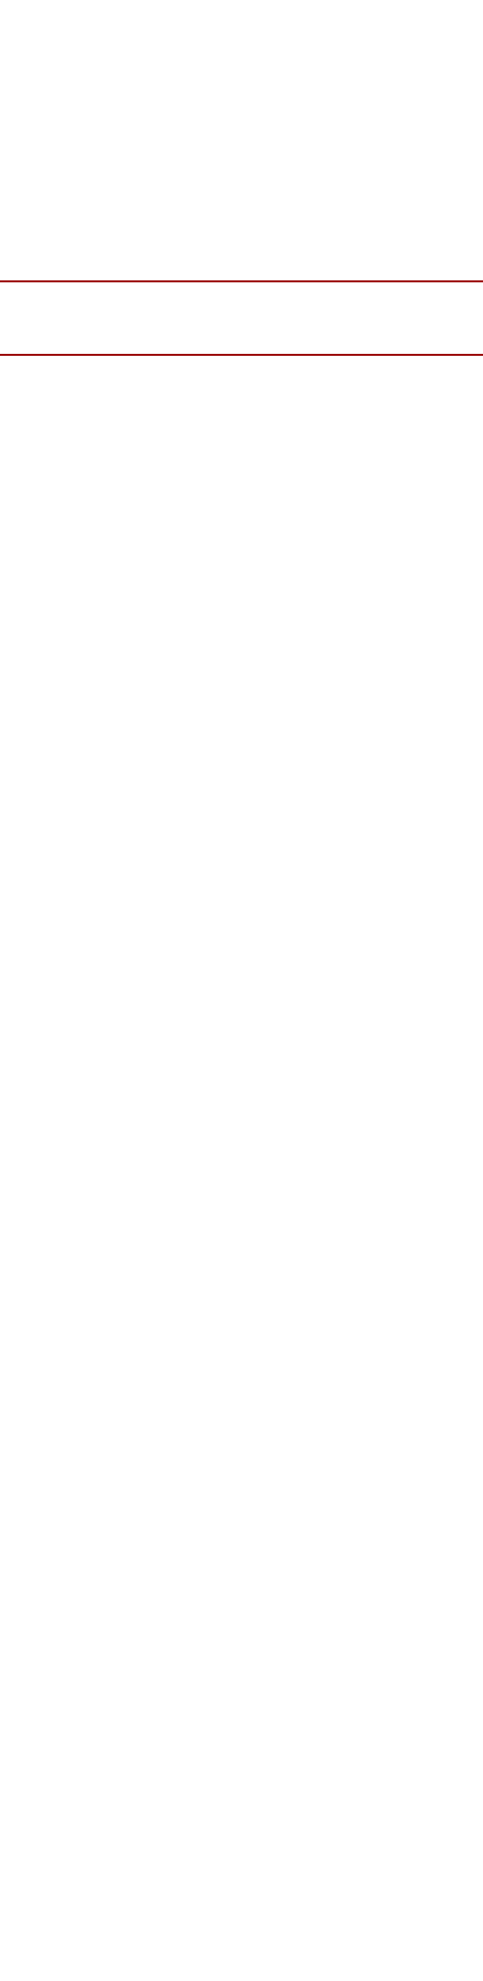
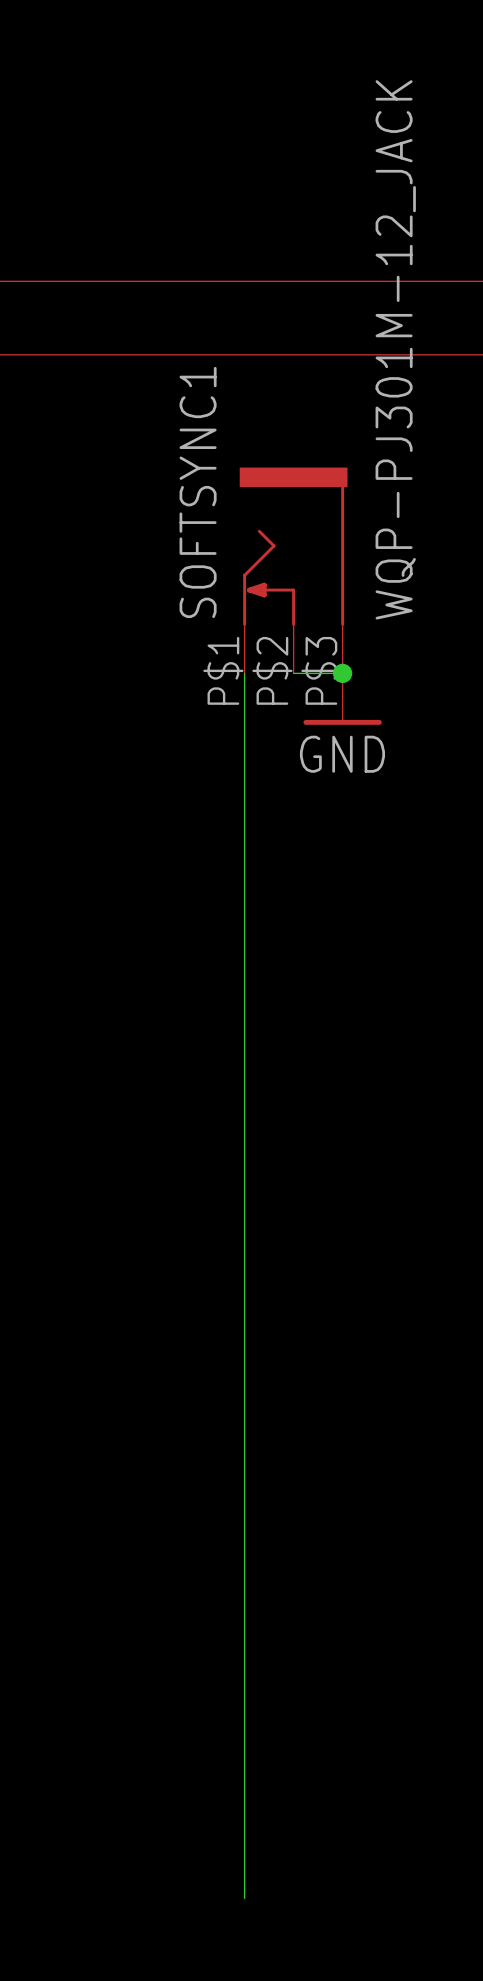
SOFTSYNC1: none -> WQP-PJ301M-12_JACK (293, 570)
wire: none -> (244, 673) (244, 1898)
wire: none -> (293, 673) (342, 673)
junction: none -> (342, 673)
power symbol: none -> GND (342, 699)

